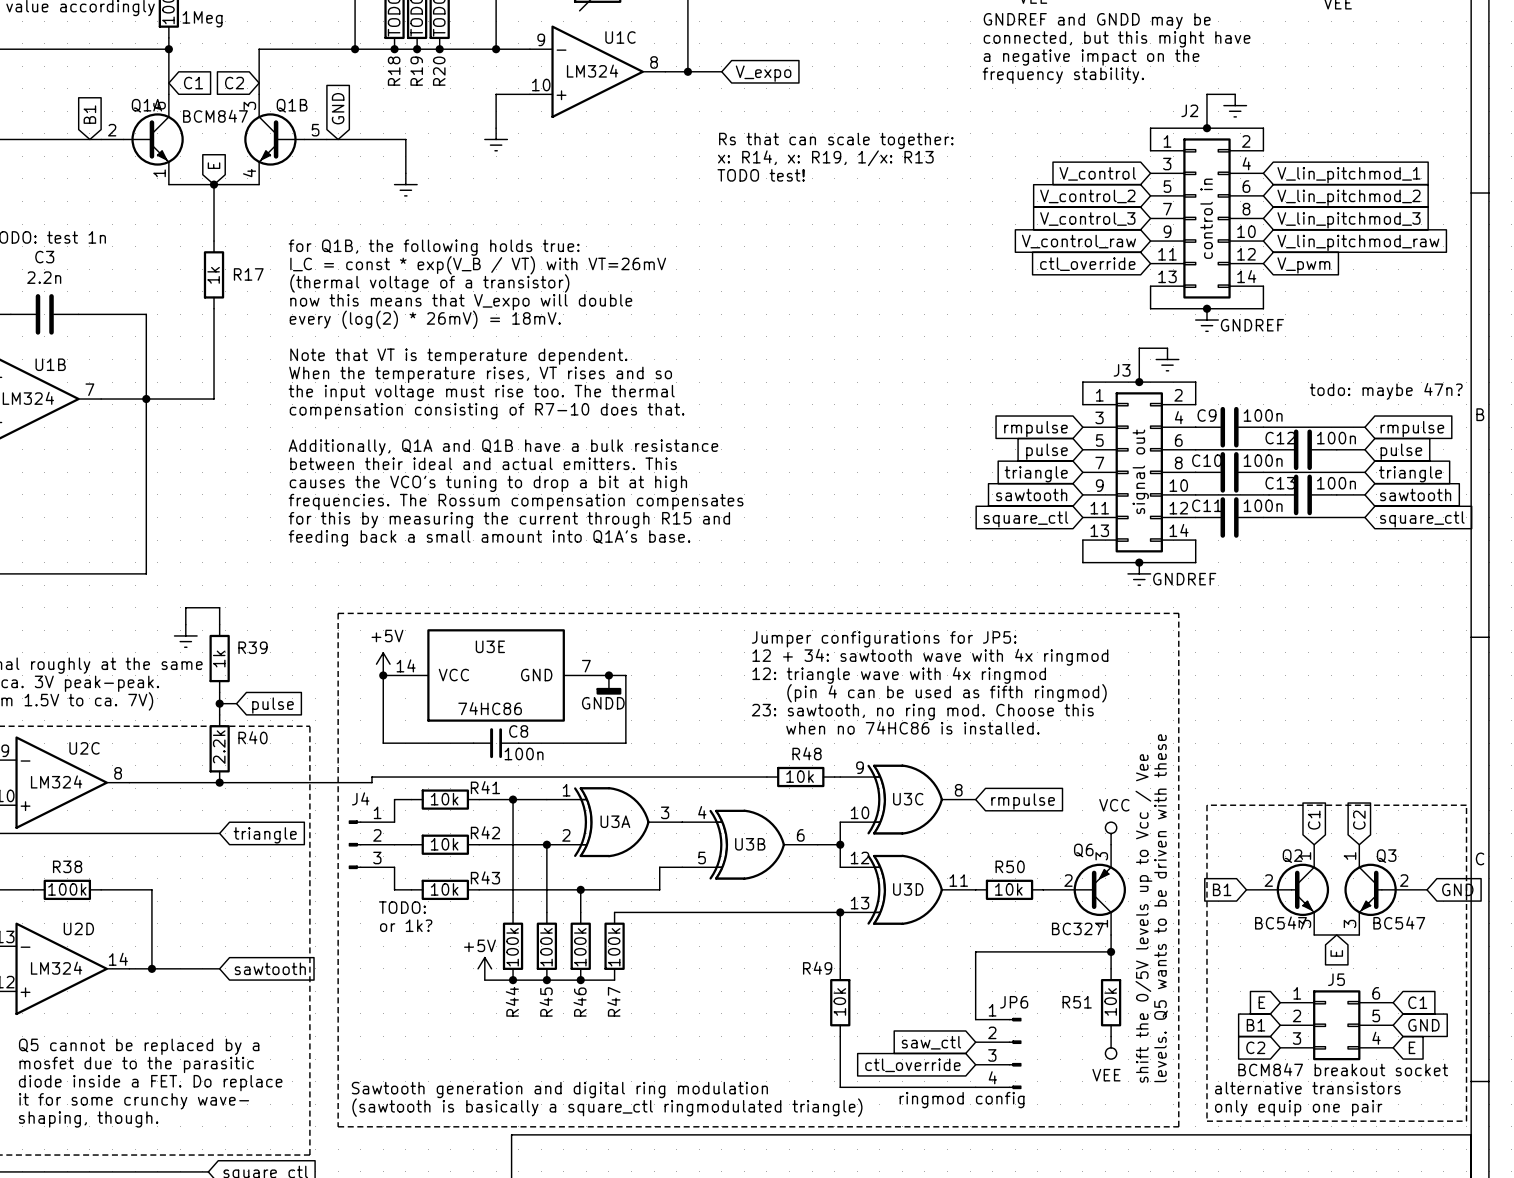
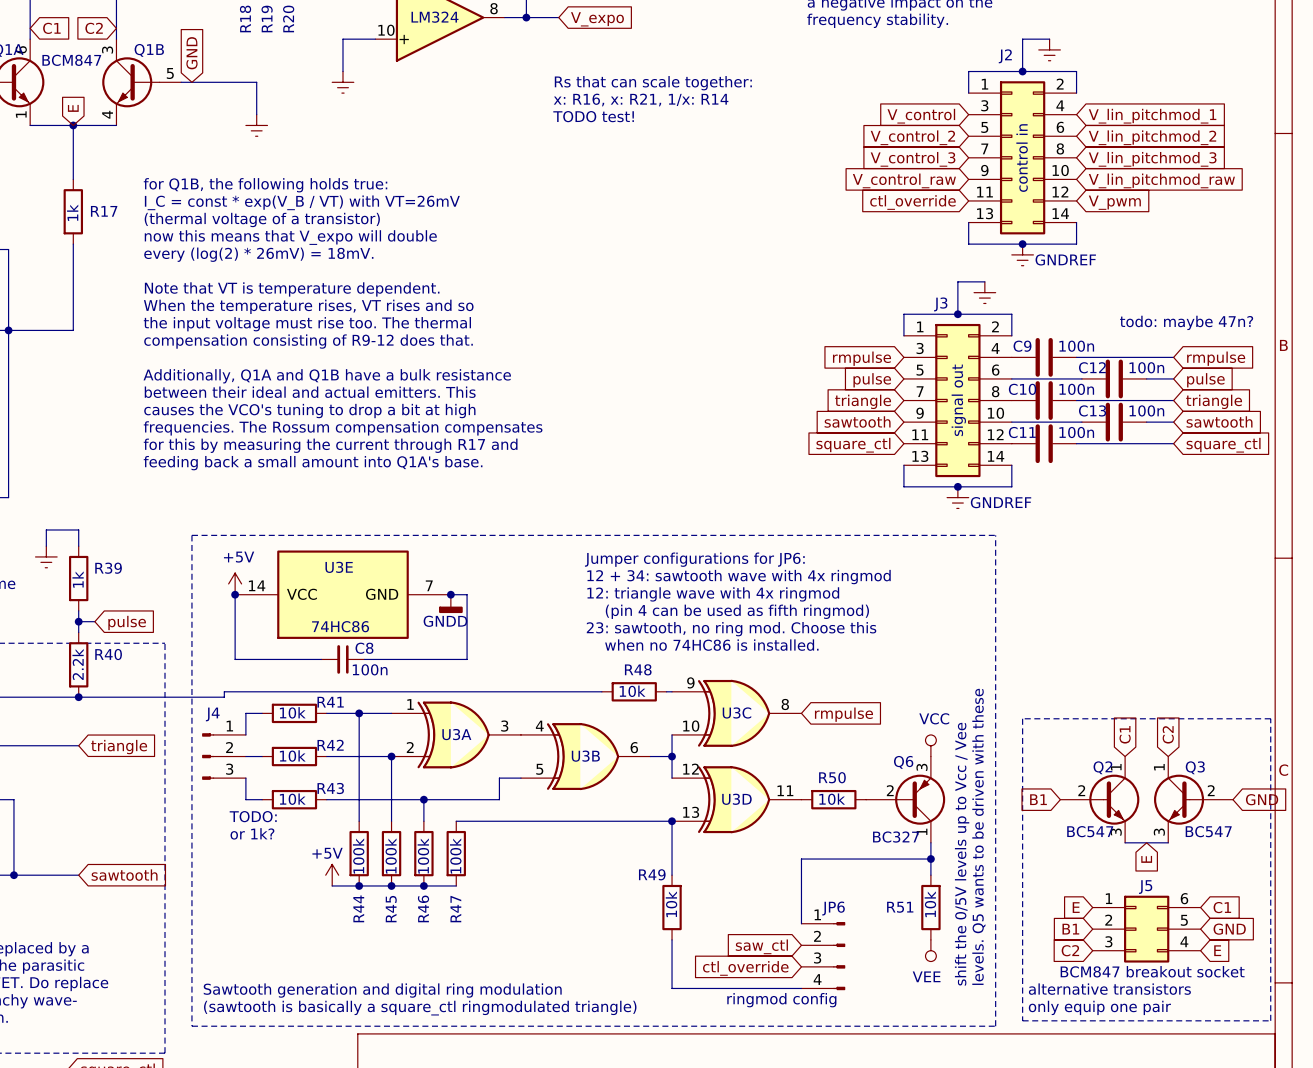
text: x: R14, x: R19, 1/x: R13 (825, 158) -> x: R16, x: R21, 1/x: R14 (641, 100)
text: compensation consisting of R7-10 does that. (487, 411) -> compensation consisting of R9-12 does that. (308, 341)
text: for this by measuring the current through R15 and (509, 520) -> for this by measuring the current through R17 and (330, 445)
text: Jumper configurations for JP5: (884, 639) -> Jumper configurations for JP6: (694, 559)

